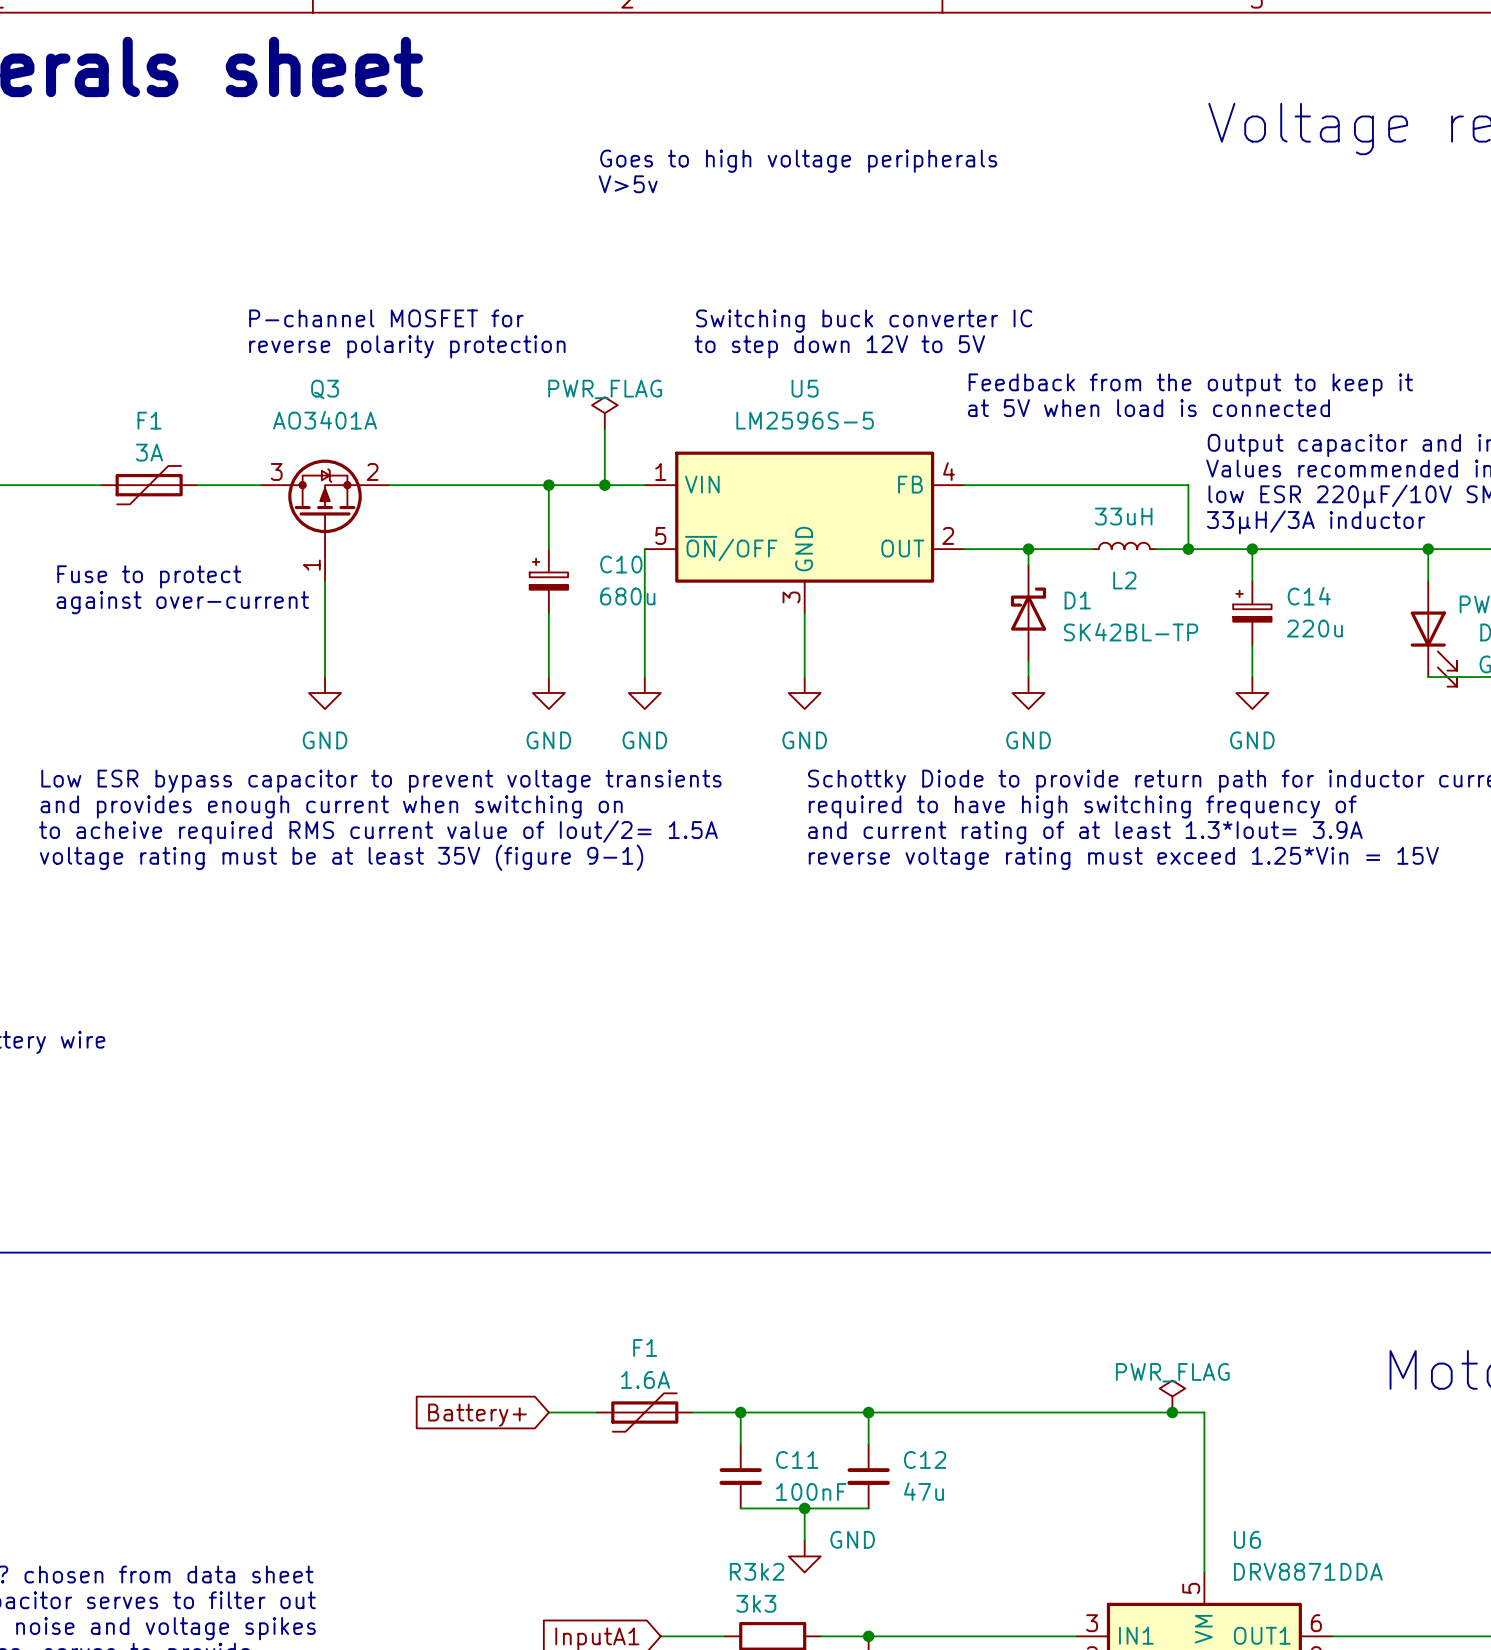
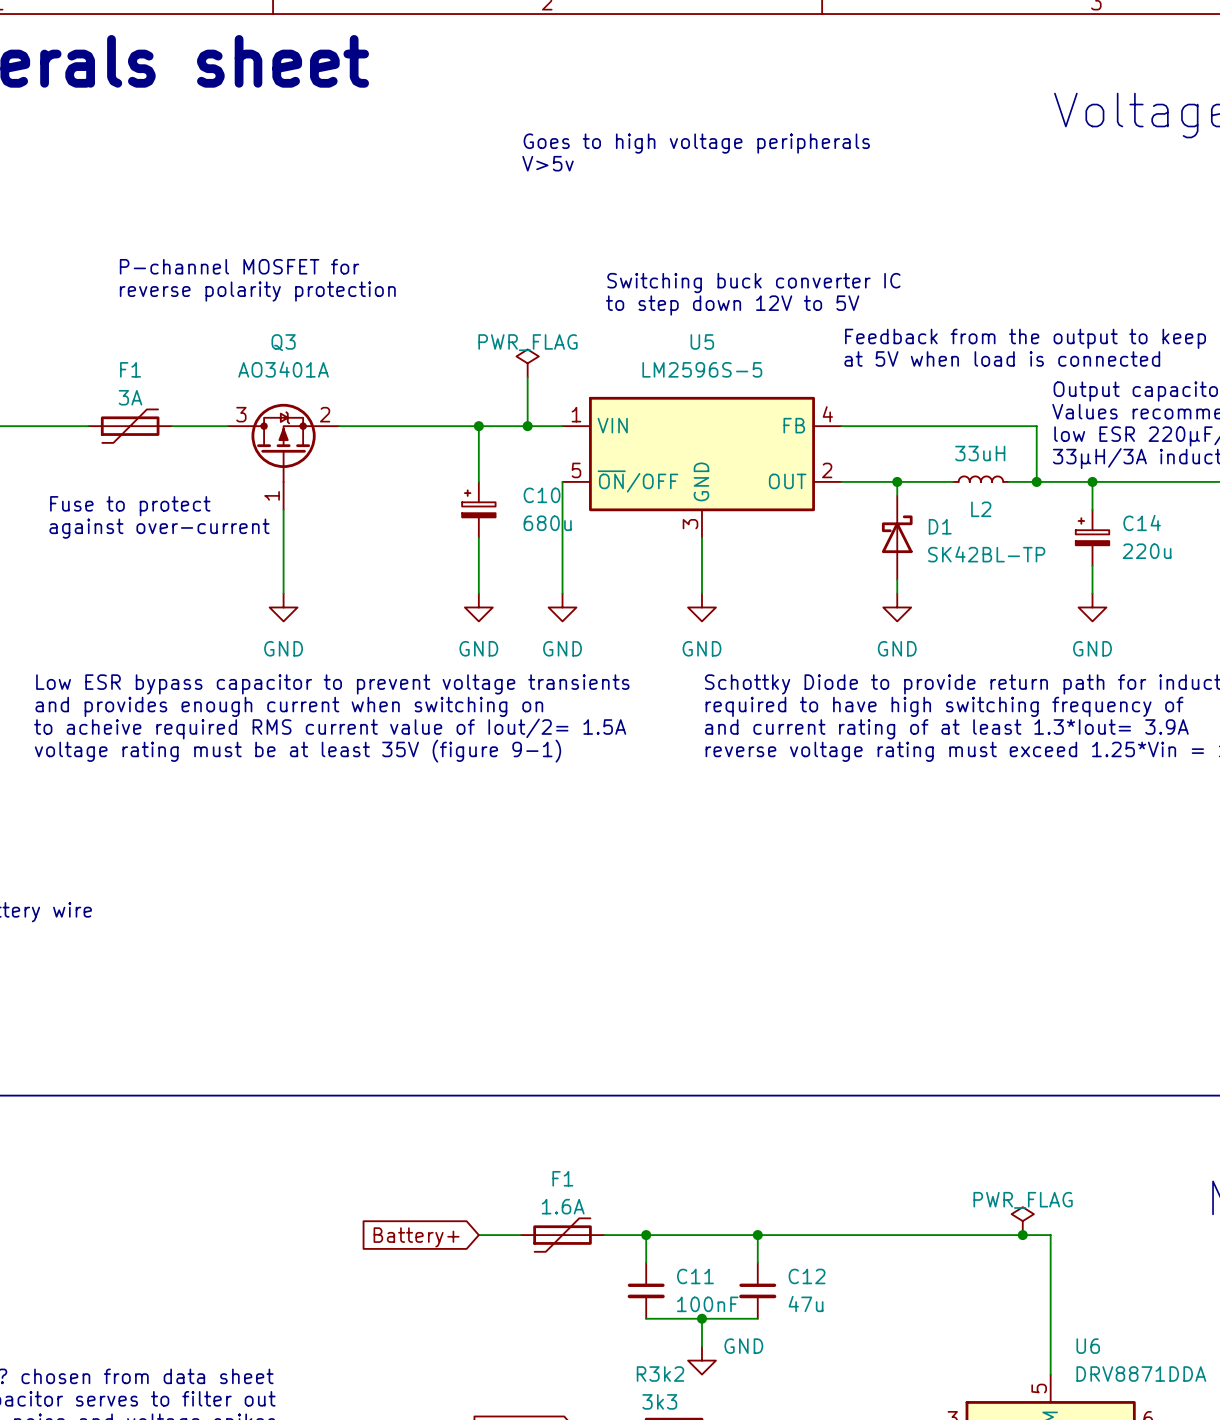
text position: P-channel MOSFET for (386, 318) -> P-channel MOSFET for (239, 266)
text position: reverse polarity protection (407, 346) -> reverse polarity protection (257, 291)

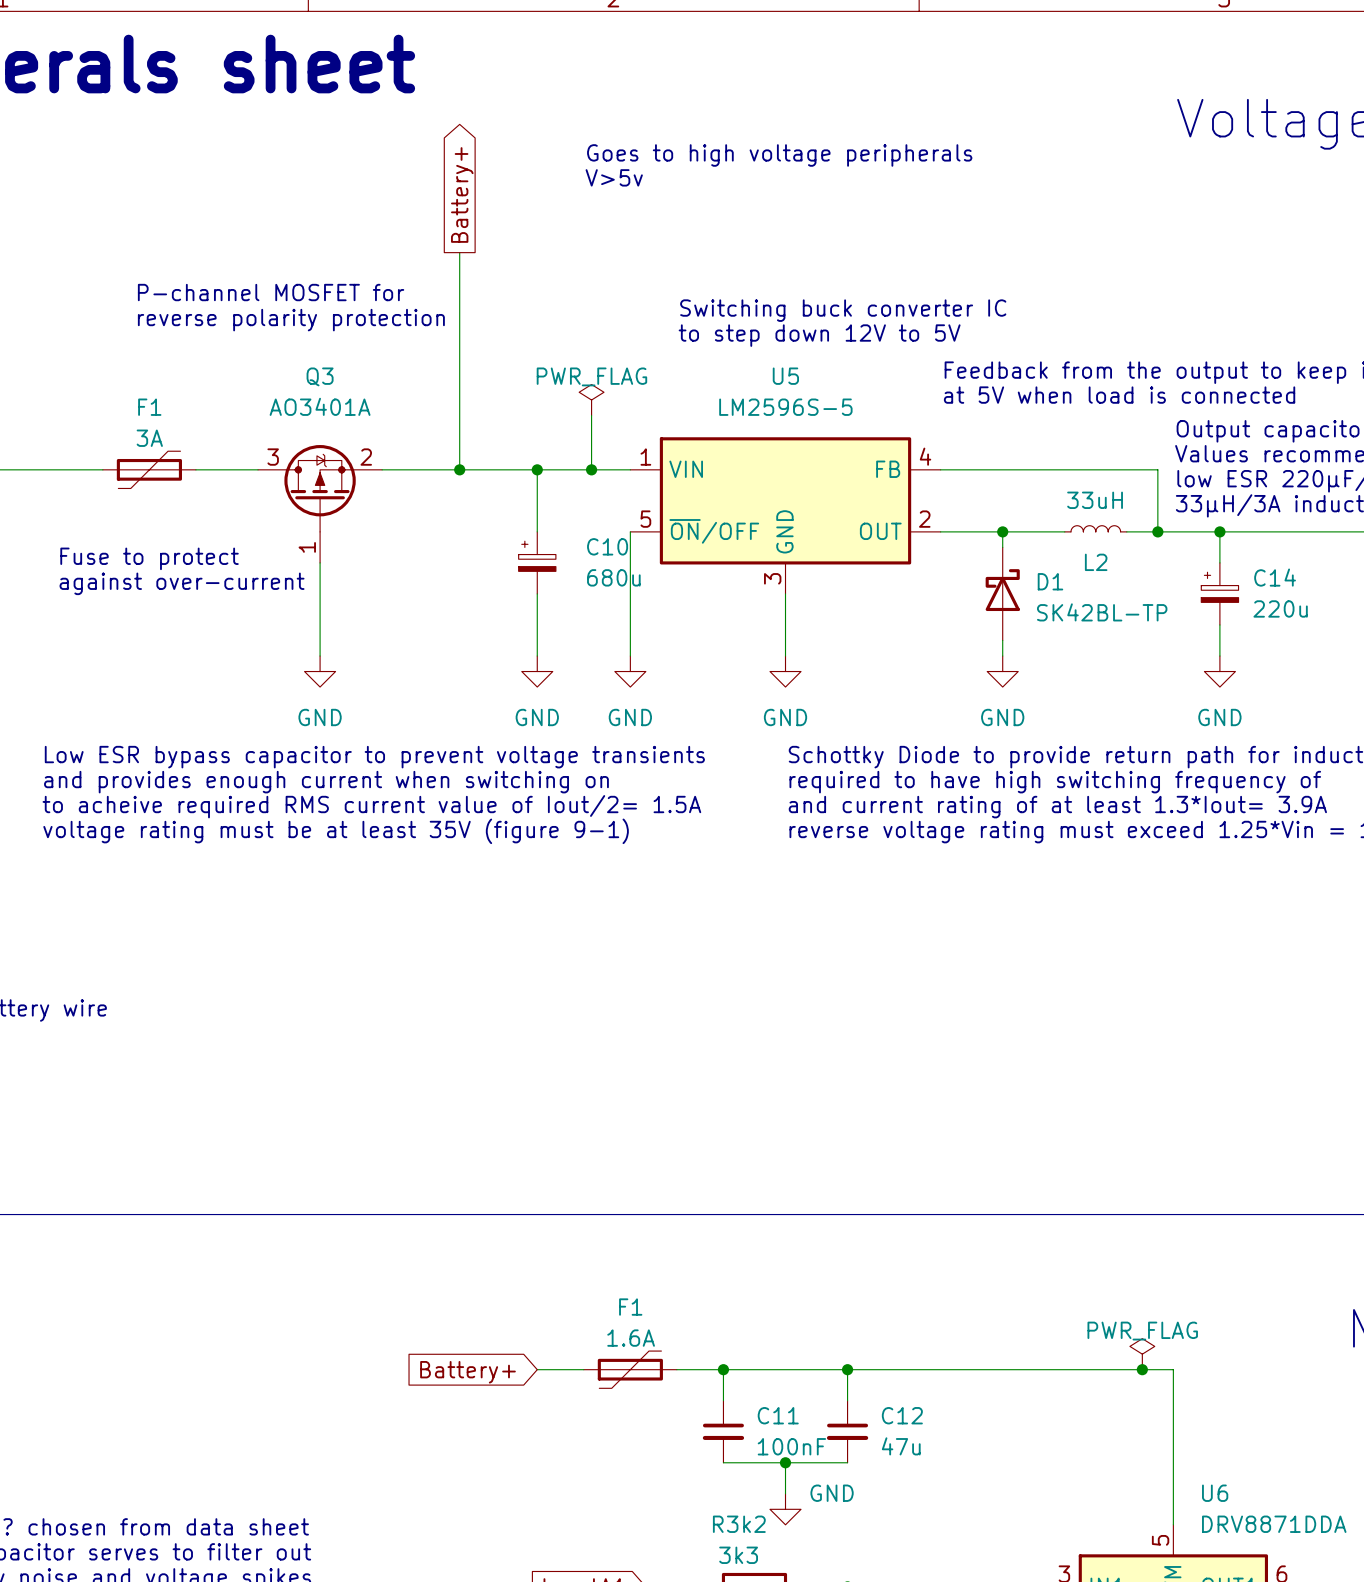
global label: none -> Battery+ (462, 194)
wire: none -> (459, 252) (459, 469)
junction: none -> (459, 469)

